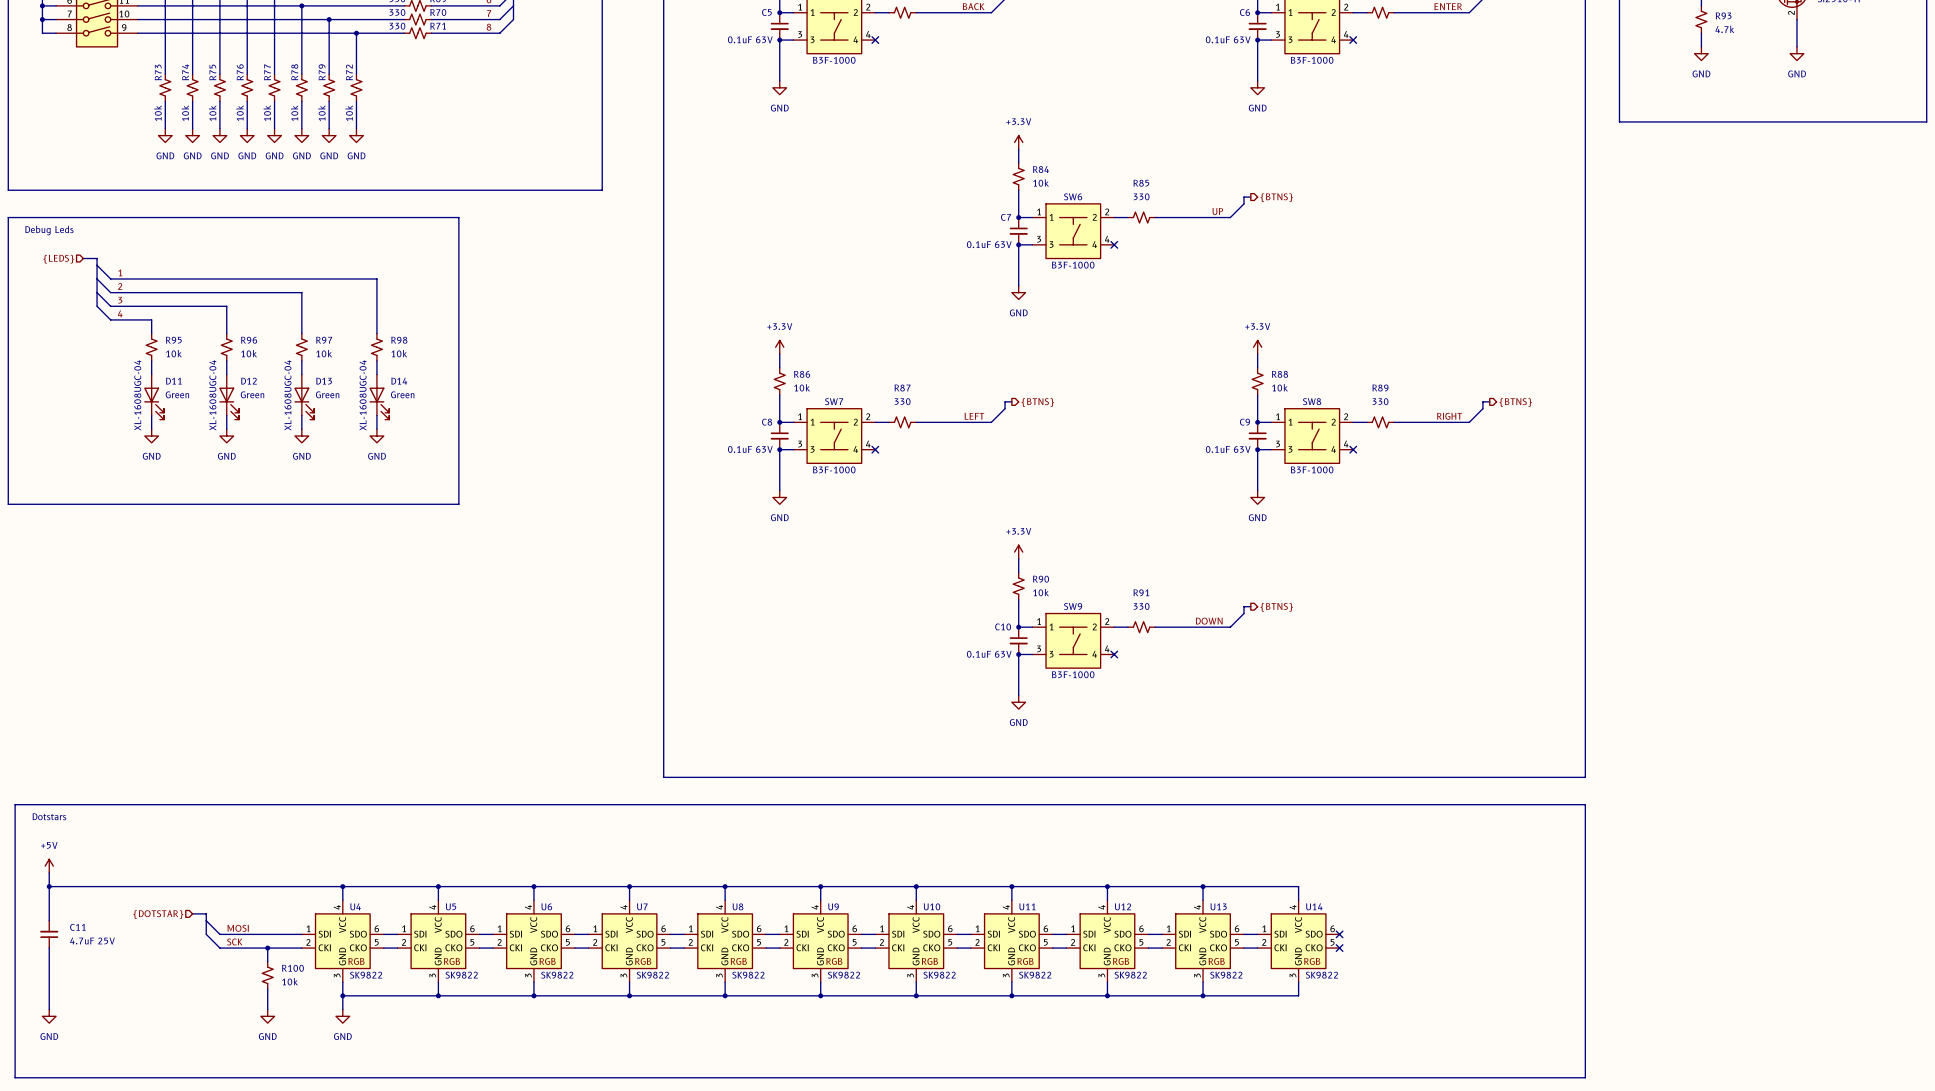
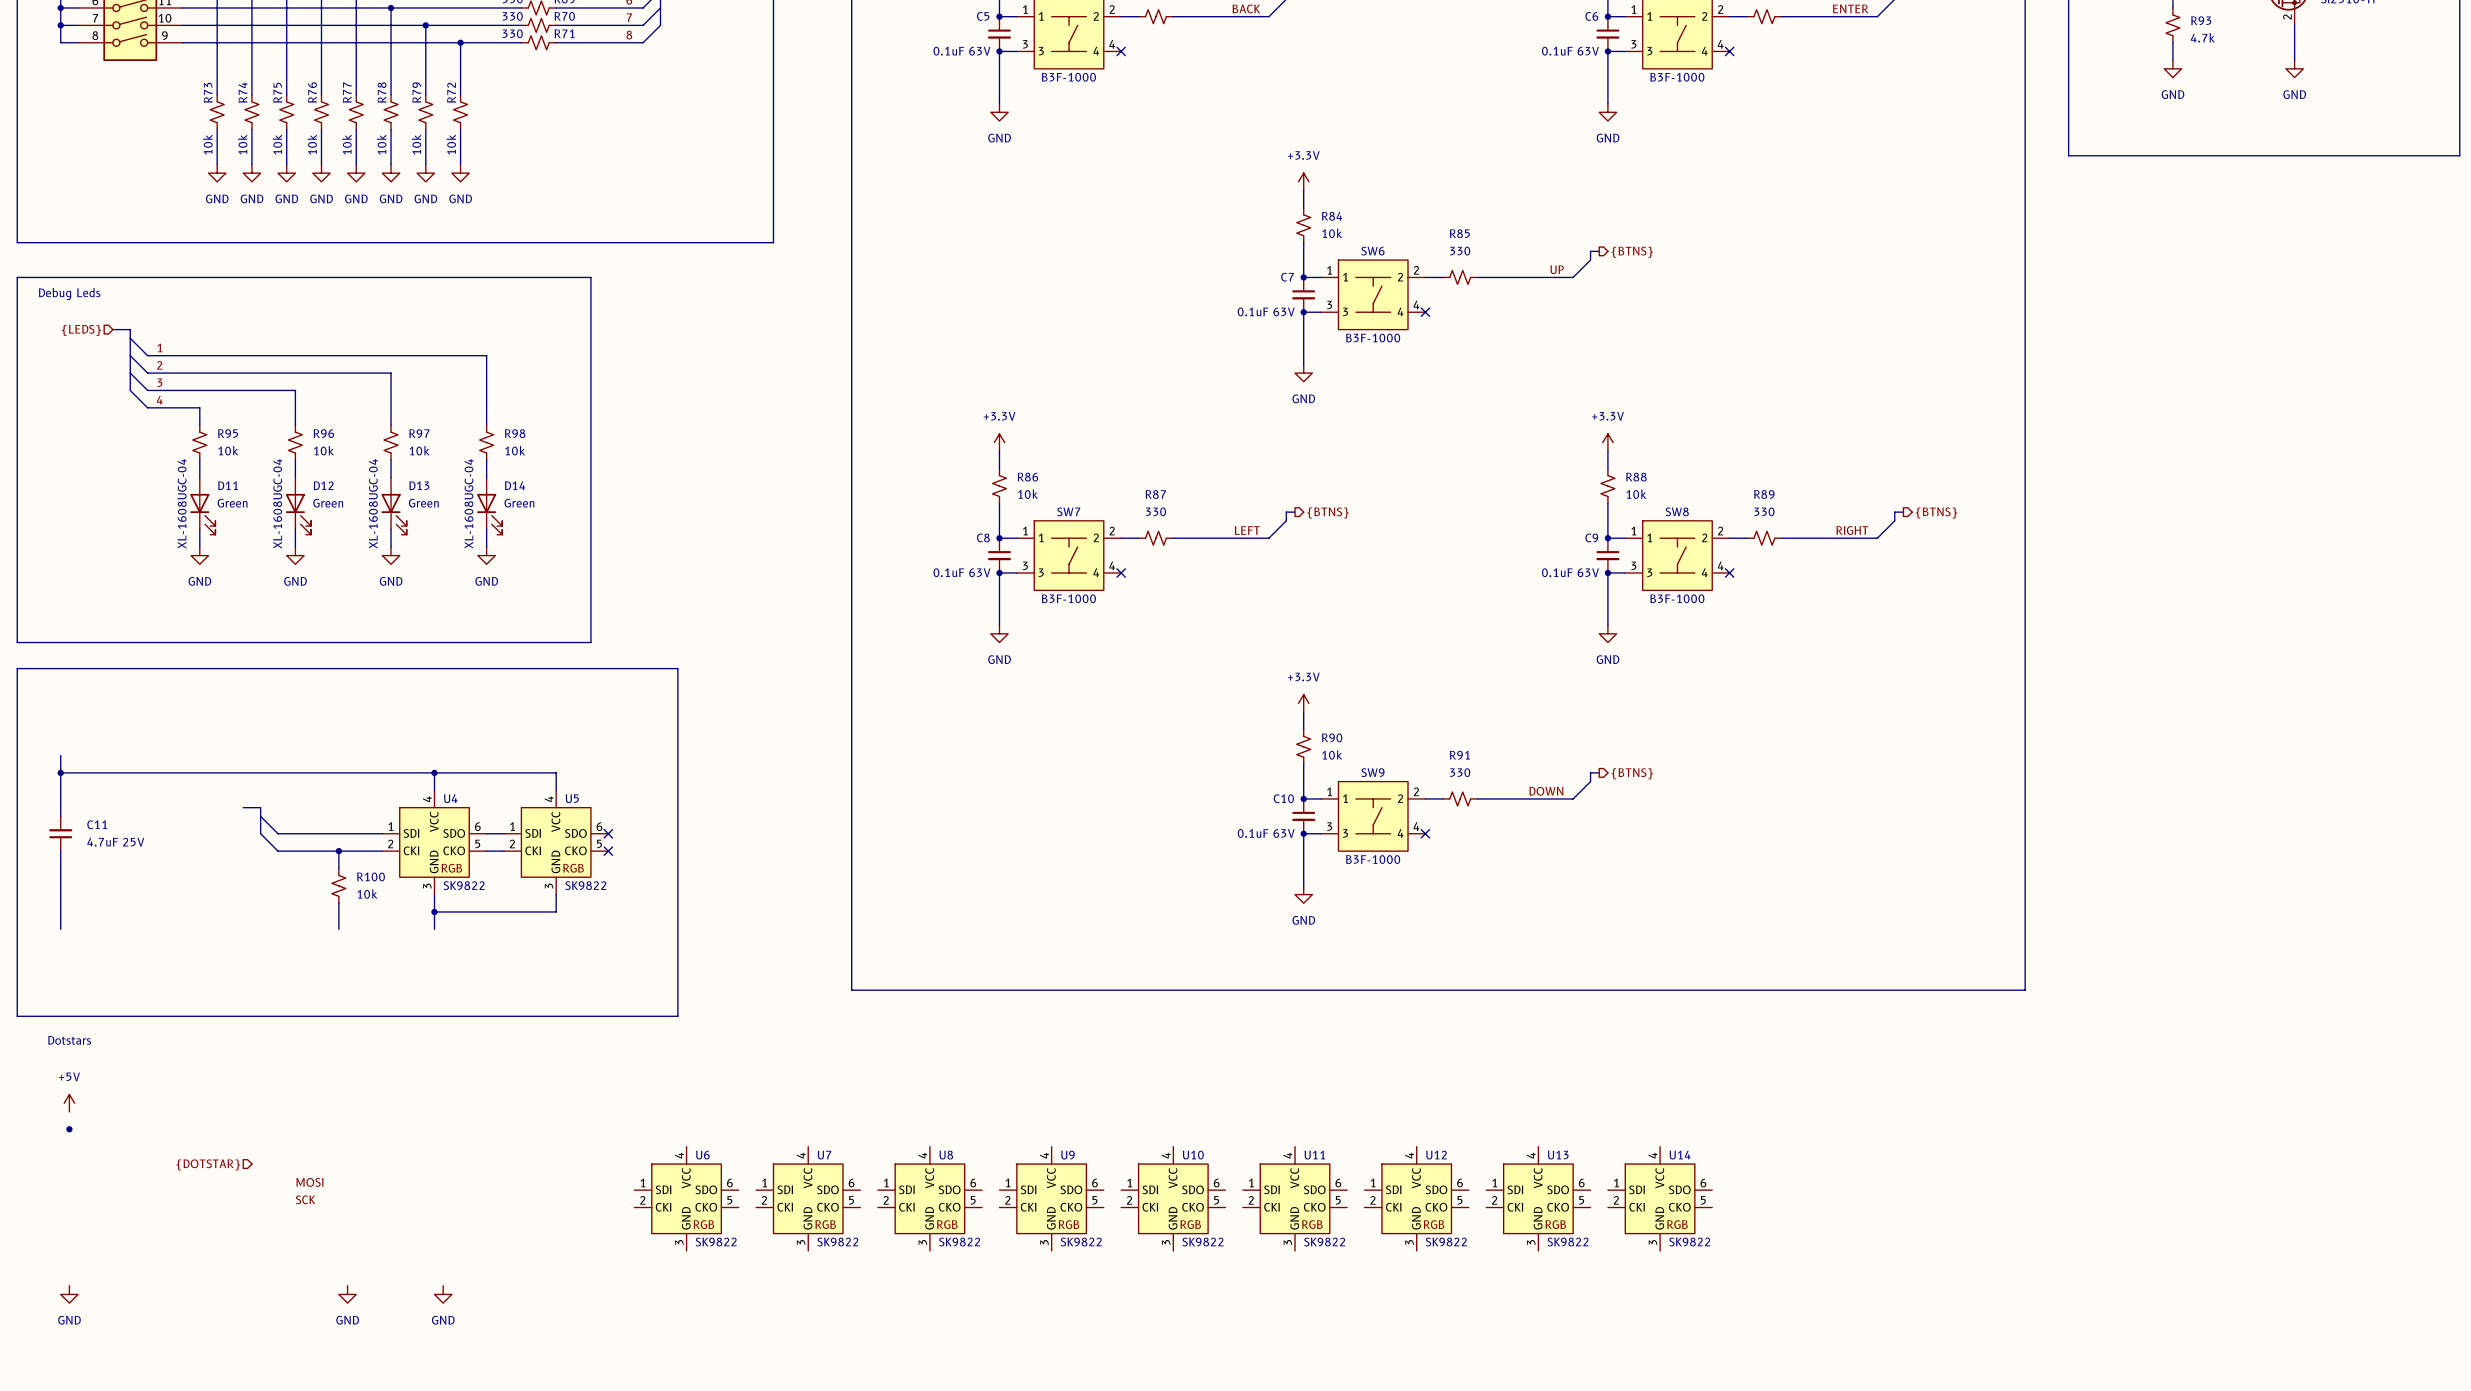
line: none -> (17, 668) (677, 668) (677, 1016) (17, 1016) (17, 668)
wire: none -> (60, 755) (60, 816)
wire: none -> (60, 772) (556, 772) (556, 790)
junction: none -> (60, 772)
wire: none -> (434, 772) (434, 790)
junction: none -> (434, 772)
bus: none -> (243, 807) (260, 807) (260, 833)
wire: none -> (260, 816) (278, 833) (382, 833)
wire: none -> (260, 833) (278, 851) (382, 851)
wire: none -> (486, 833) (504, 833)
no-connect mark: none -> (608, 833)
wire: none -> (60, 851) (60, 929)
wire: none -> (338, 851) (338, 868)
junction: none -> (338, 851)
wire: none -> (486, 851) (504, 851)
no-connect mark: none -> (608, 851)
wire: none -> (434, 894) (434, 929)
wire: none -> (556, 894) (556, 911) (434, 911)
wire: none -> (338, 903) (338, 929)
junction: none -> (434, 911)
line: (15, 804) (1585, 804) (1585, 1077) (15, 1077) (15, 804) -> none
wire: (49, 872) (49, 920) -> none
wire: (49, 886) (1298, 886) (1298, 900) -> none
wire: (342, 886) (342, 900) -> none
junction: (342, 886) -> none
wire: (438, 886) (438, 900) -> none
junction: (438, 886) -> none
wire: (533, 886) (533, 900) -> none
junction: (533, 886) -> none
wire: (629, 886) (629, 900) -> none
junction: (629, 886) -> none
wire: (725, 886) (725, 900) -> none
junction: (725, 886) -> none
wire: (820, 886) (820, 900) -> none
junction: (820, 886) -> none
wire: (916, 886) (916, 900) -> none
junction: (916, 886) -> none
wire: (1011, 886) (1011, 900) -> none
junction: (1011, 886) -> none
wire: (1107, 886) (1107, 900) -> none
junction: (1107, 886) -> none
wire: (1203, 886) (1203, 900) -> none
junction: (1203, 886) -> none
bus: (192, 913) (206, 913) (206, 934) -> none
wire: (206, 920) (219, 934) (301, 934) -> none
C11 position: (49, 934) -> (60, 833)
wire: (206, 934) (219, 948) (301, 948) -> none
wire: (383, 934) (397, 934) -> none
wire: (479, 934) (493, 934) -> none
wire: (574, 934) (588, 934) -> none
wire: (670, 934) (684, 934) -> none
wire: (766, 934) (779, 934) -> none
wire: (861, 934) (875, 934) -> none
wire: (957, 934) (970, 934) -> none
wire: (1052, 934) (1066, 934) -> none
wire: (1148, 934) (1162, 934) -> none
wire: (1243, 934) (1257, 934) -> none
no-connect mark: (1339, 934) -> none
U4 position: (342, 941) -> (434, 842)
U5 position: (438, 941) -> (556, 842)
wire: (49, 948) (49, 1009) -> none
wire: (267, 948) (267, 961) -> none
junction: (267, 948) -> none
wire: (383, 948) (397, 948) -> none
wire: (479, 948) (493, 948) -> none
wire: (574, 948) (588, 948) -> none
wire: (670, 948) (684, 948) -> none
wire: (766, 948) (779, 948) -> none
wire: (861, 948) (875, 948) -> none
wire: (957, 948) (970, 948) -> none
wire: (1052, 948) (1066, 948) -> none
wire: (1148, 948) (1162, 948) -> none
wire: (1243, 948) (1257, 948) -> none
no-connect mark: (1339, 948) -> none
R100 position: (267, 975) -> (338, 885)
wire: (342, 982) (342, 1009) -> none
wire: (438, 982) (438, 995) -> none
wire: (533, 982) (533, 995) -> none
wire: (629, 982) (629, 995) -> none
wire: (725, 982) (725, 995) -> none
wire: (820, 982) (820, 995) -> none
wire: (916, 982) (916, 995) -> none
wire: (1011, 982) (1011, 995) -> none
wire: (1107, 982) (1107, 995) -> none
wire: (1203, 982) (1203, 995) -> none
wire: (1298, 982) (1298, 995) (342, 995) -> none
wire: (267, 989) (267, 1009) -> none
junction: (342, 995) -> none
junction: (438, 995) -> none
junction: (533, 995) -> none
junction: (629, 995) -> none
junction: (725, 995) -> none
junction: (820, 995) -> none
junction: (916, 995) -> none
junction: (1011, 995) -> none
junction: (1107, 995) -> none
junction: (1203, 995) -> none

